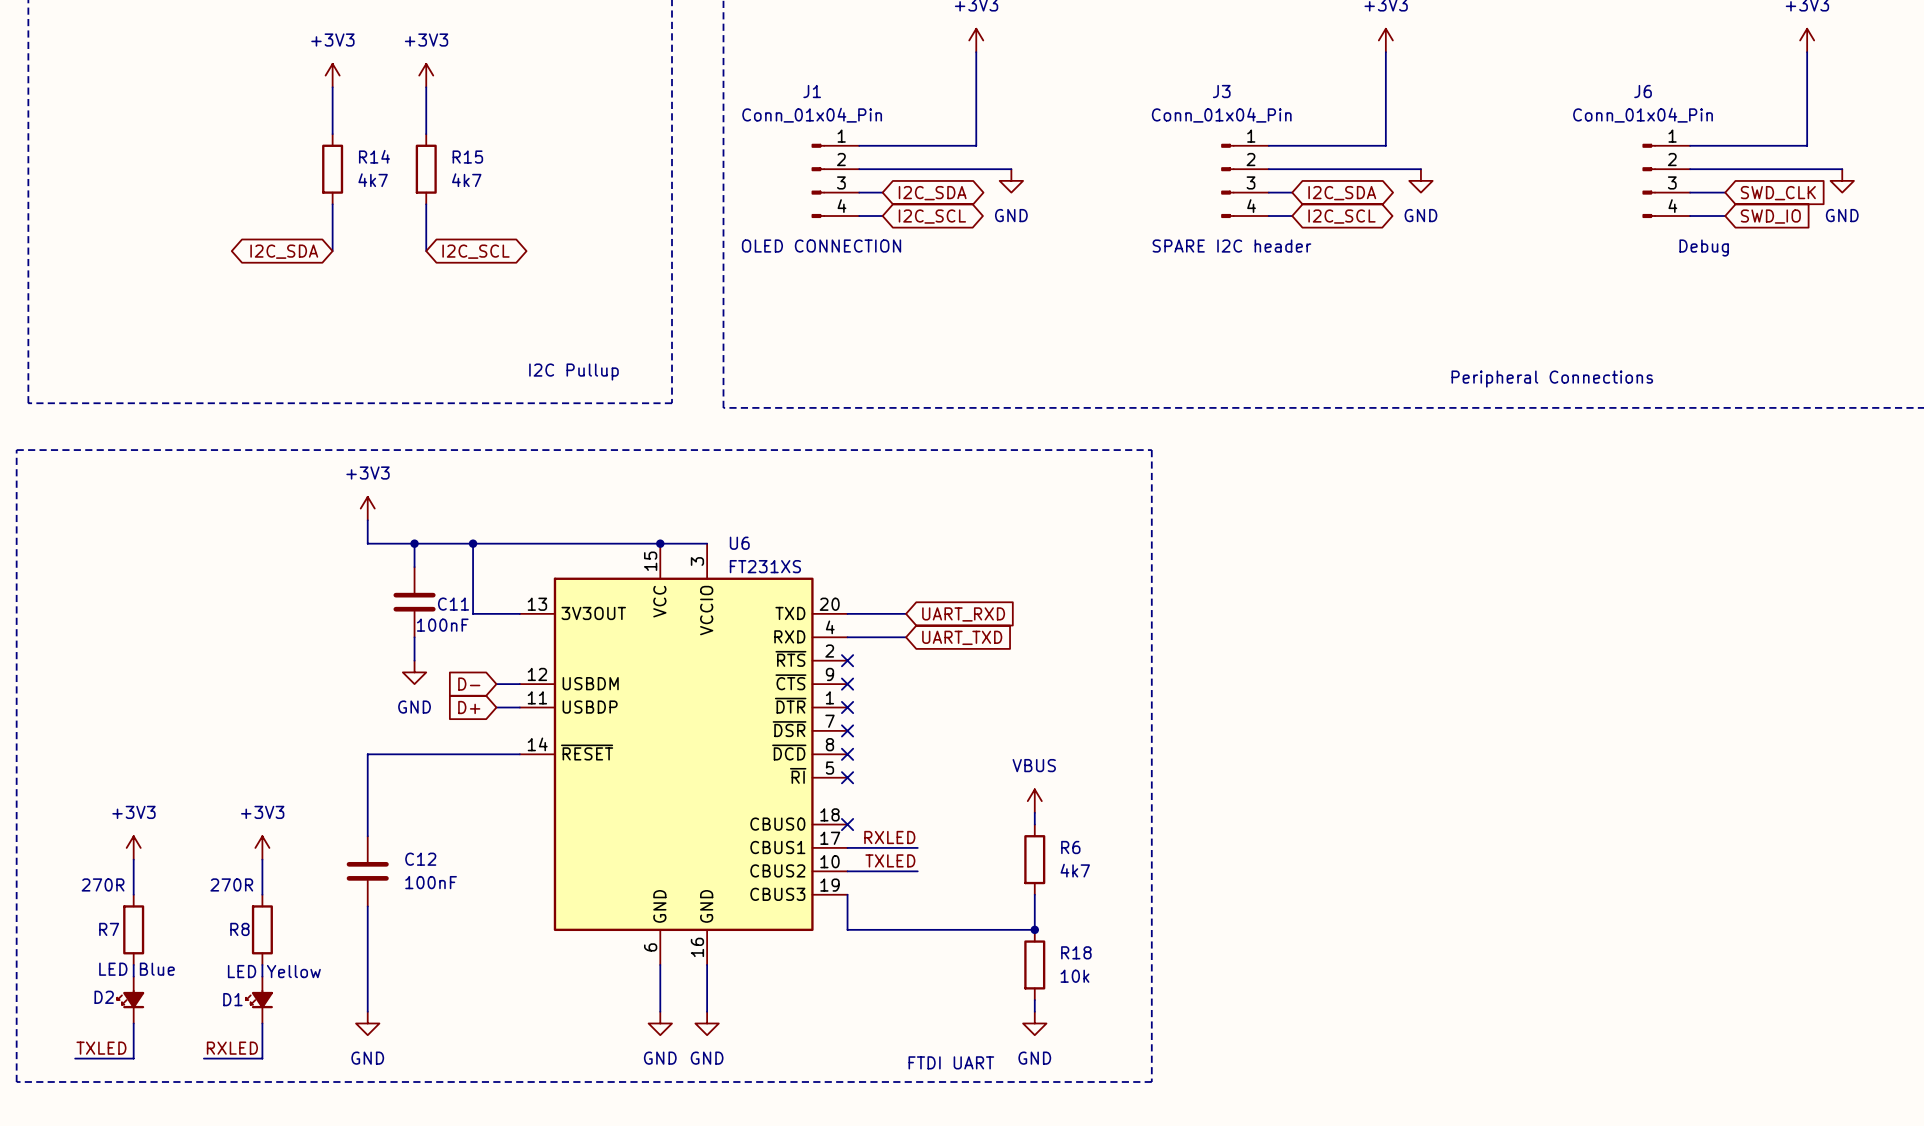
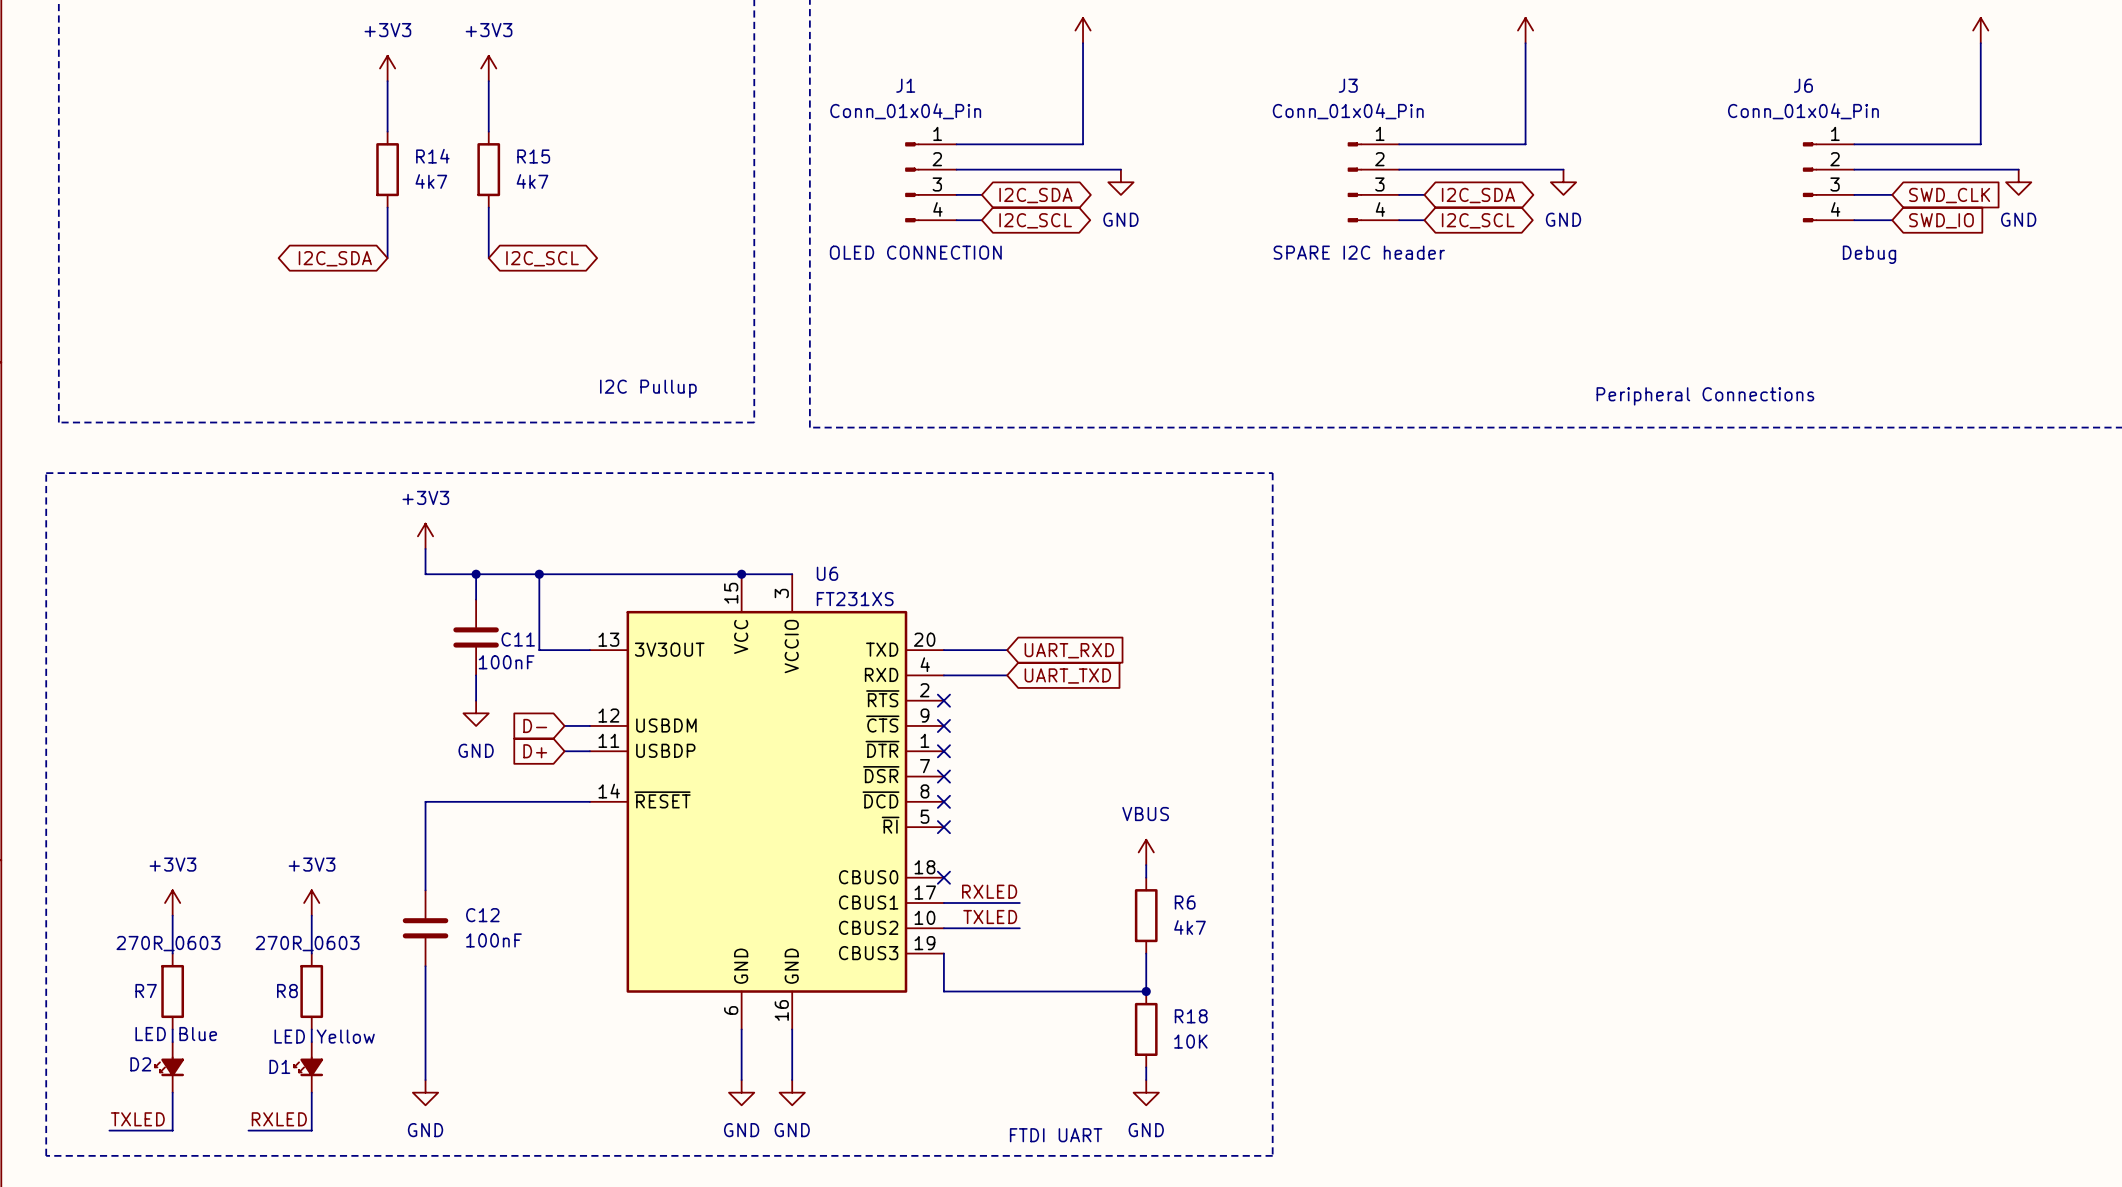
R7 value: 270R (103, 884) -> 270R_0603 (168, 943)
R8 value: 270R (231, 884) -> 270R_0603 (307, 943)
R18 value: 10k (1074, 976) -> 10K (1190, 1041)

